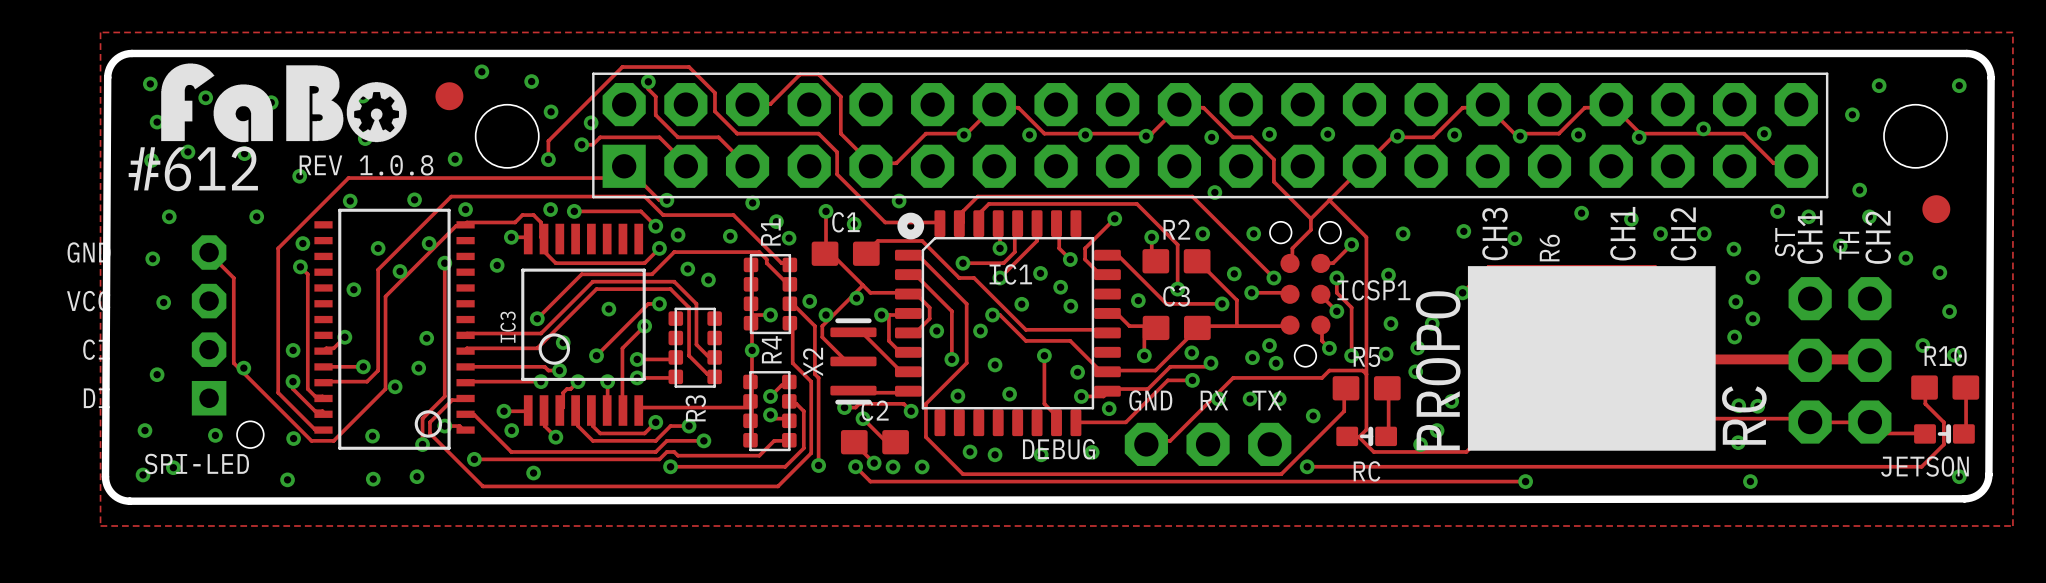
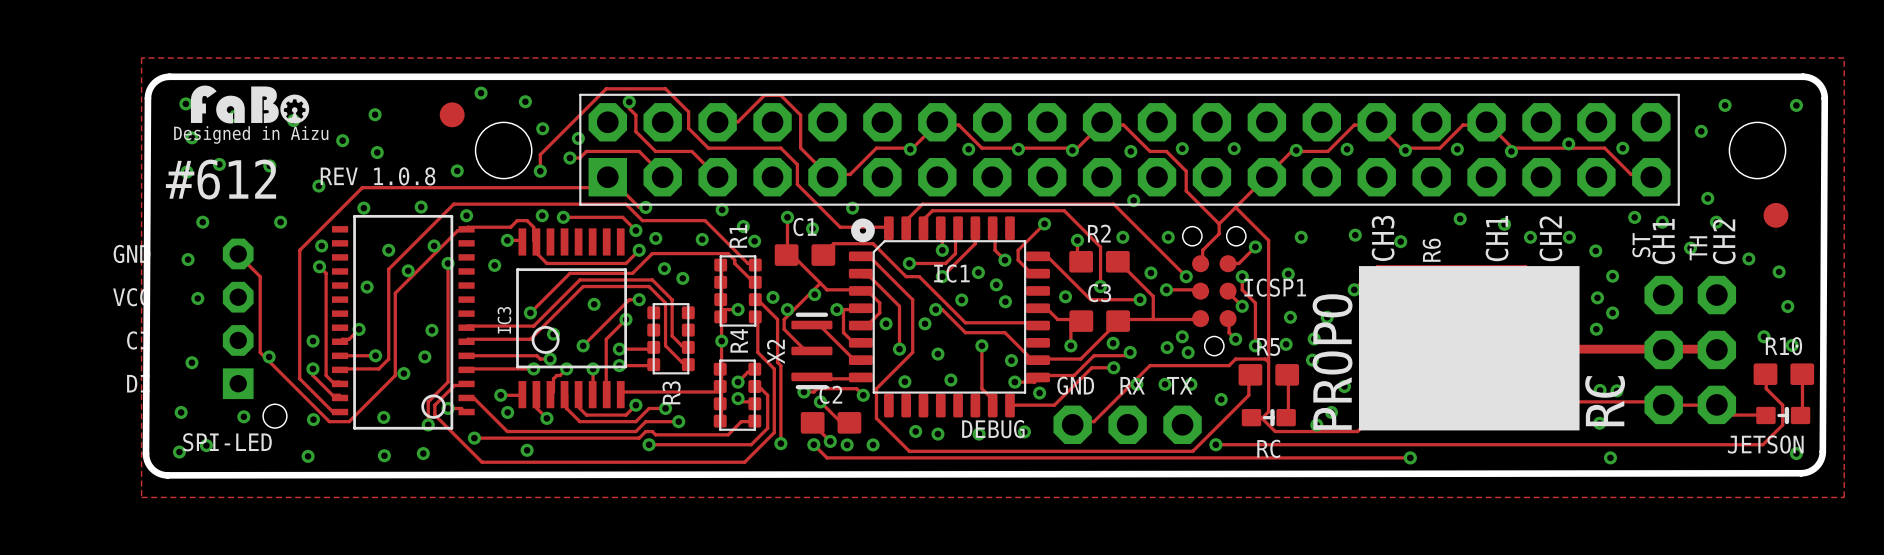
drawing: none -> [190, 85, 310, 124]
drawing: [161, 63, 407, 143] -> none
text: none -> Designed in Aizu (251, 134)

